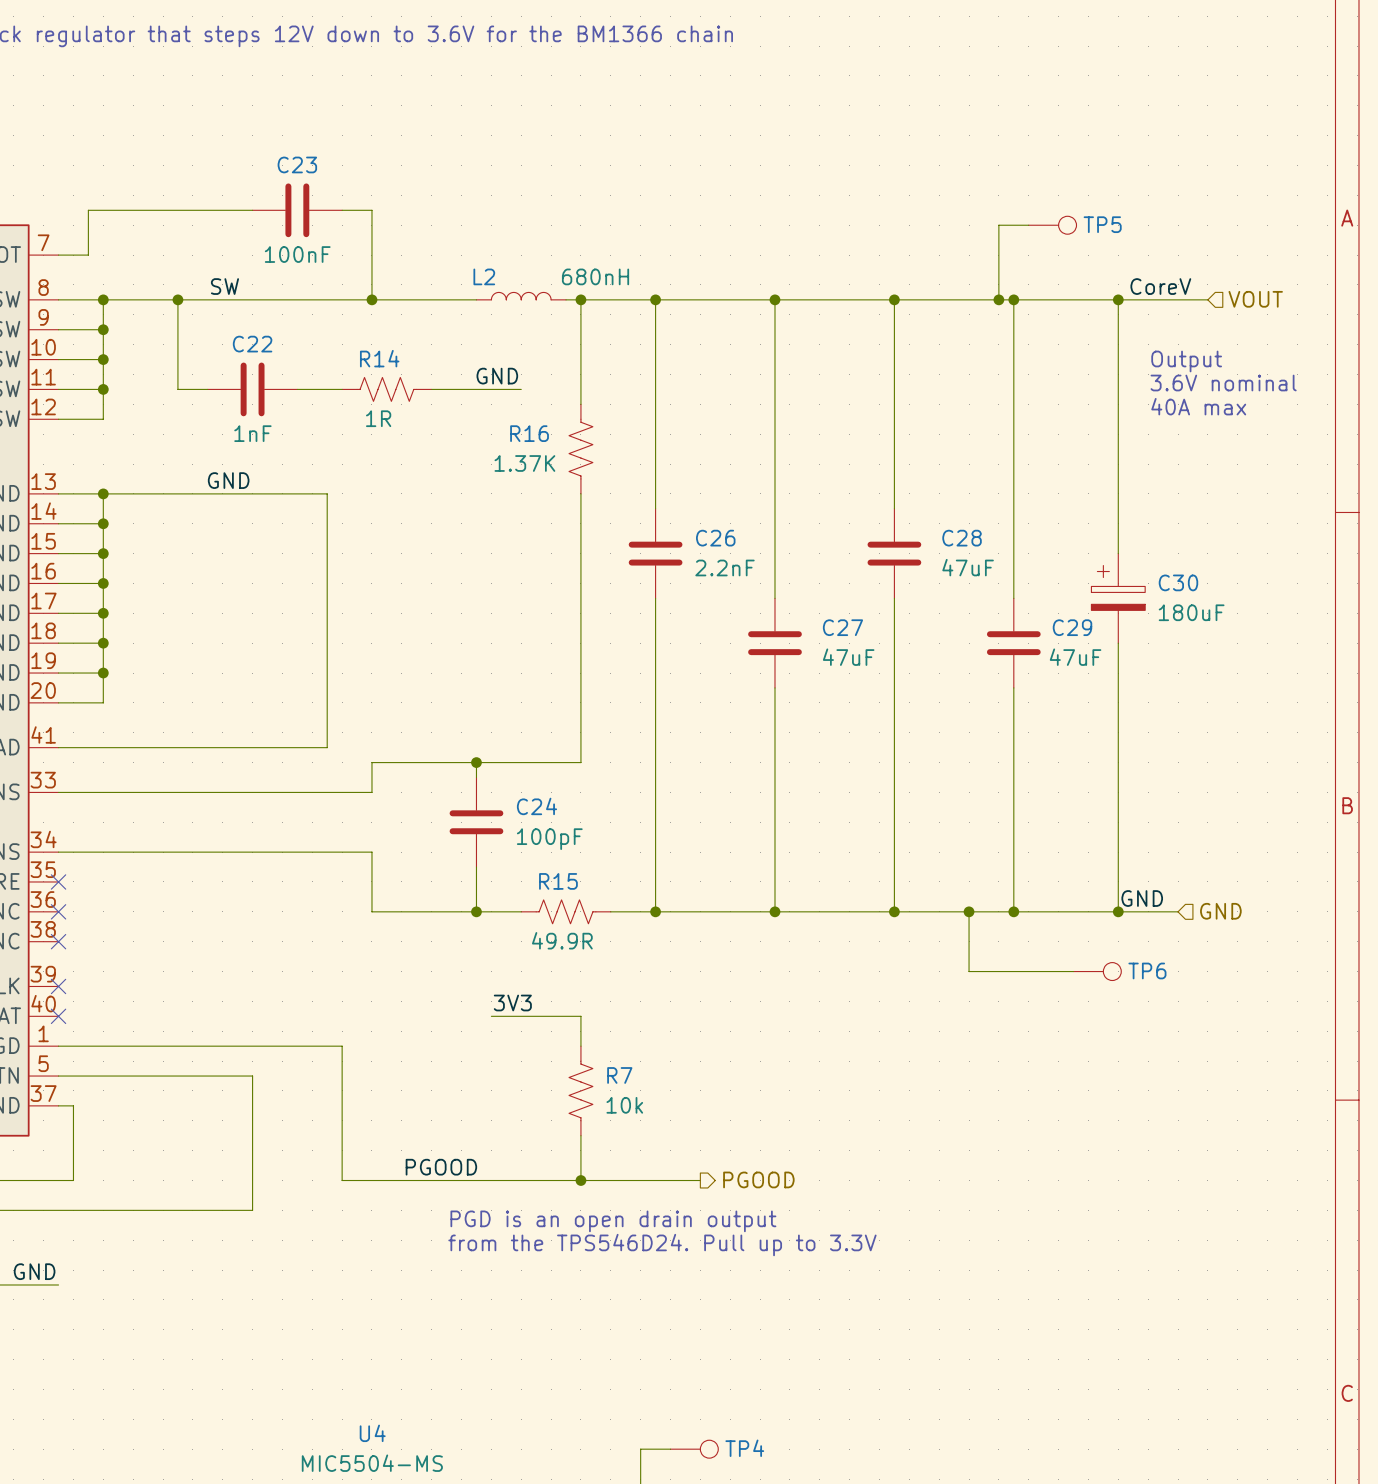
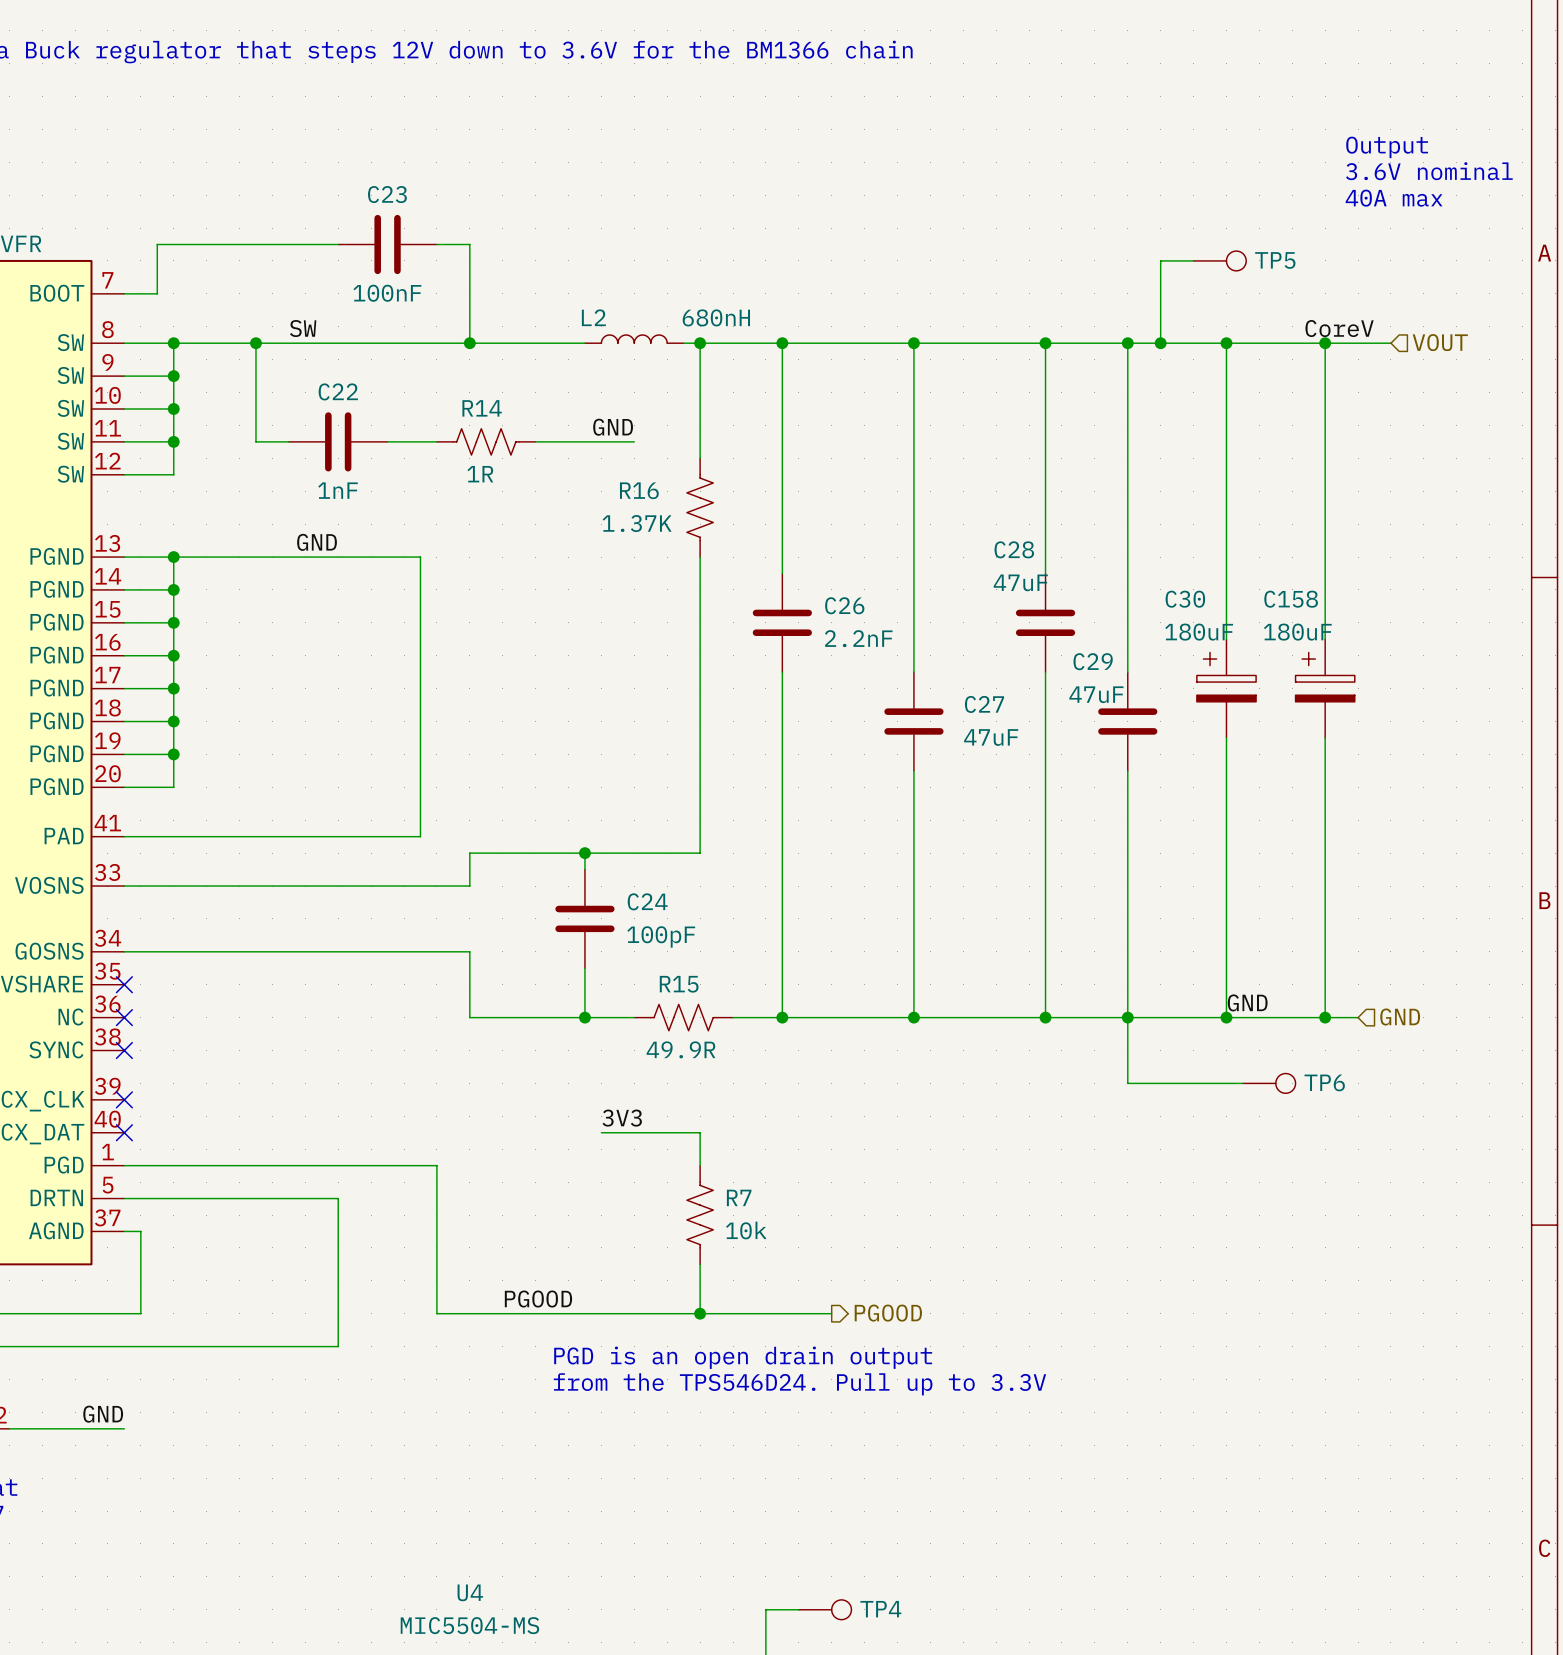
junction: none -> (1127, 343)
wire: (1013, 299) (1013, 598) -> (1127, 343) (1127, 672)
junction: (1013, 299) -> none
wire: none -> (1226, 343) (1226, 639)
junction: none -> (1226, 343)
wire: (1118, 299) (1118, 553) -> none
junction: (1118, 299) -> none
wire: none -> (1325, 343) (1325, 639)
junction: none -> (1325, 343)
text position: Output (1186, 361) -> Output (1387, 147)
text position: 3.6V nominal (1223, 383) -> 3.6V nominal (1429, 171)
text position: 40A max (1198, 406) -> 40A max (1394, 198)
C28 name position: C28 (962, 538) -> C28 (1014, 549)
C28 value position: 47uF (968, 567) -> 47uF (1020, 582)
C30 name position: C30 (1178, 582) -> C30 (1185, 599)
C30 position: (1118, 598) -> (1226, 688)
C30 value position: 180uF (1191, 612) -> 180uF (1199, 632)
C158: none -> 180uF (1325, 688)
C29 name position: C29 (1072, 627) -> C29 (1093, 661)
C29 position: (1013, 643) -> (1127, 721)
wire: (1118, 643) (1118, 911) -> none
C29 value position: 47uF (1075, 657) -> 47uF (1096, 694)
wire: none -> (1226, 737) (1226, 1017)
wire: none -> (1325, 737) (1325, 1017)
wire: (1013, 687) (1013, 911) -> (1127, 770) (1127, 1017)
label position: GND (1142, 898) -> GND (1247, 1002)
junction: (1013, 911) -> none
junction: none -> (1226, 1017)
junction: (1118, 911) -> none
junction: none -> (1325, 1017)

